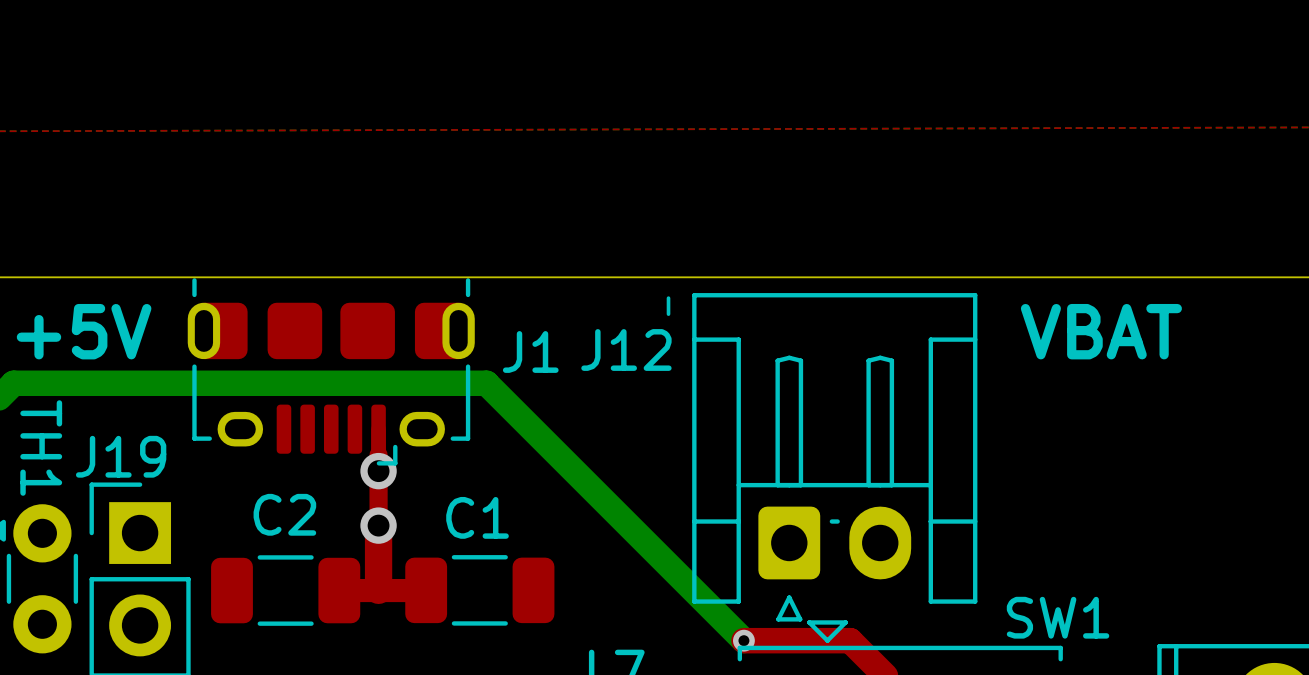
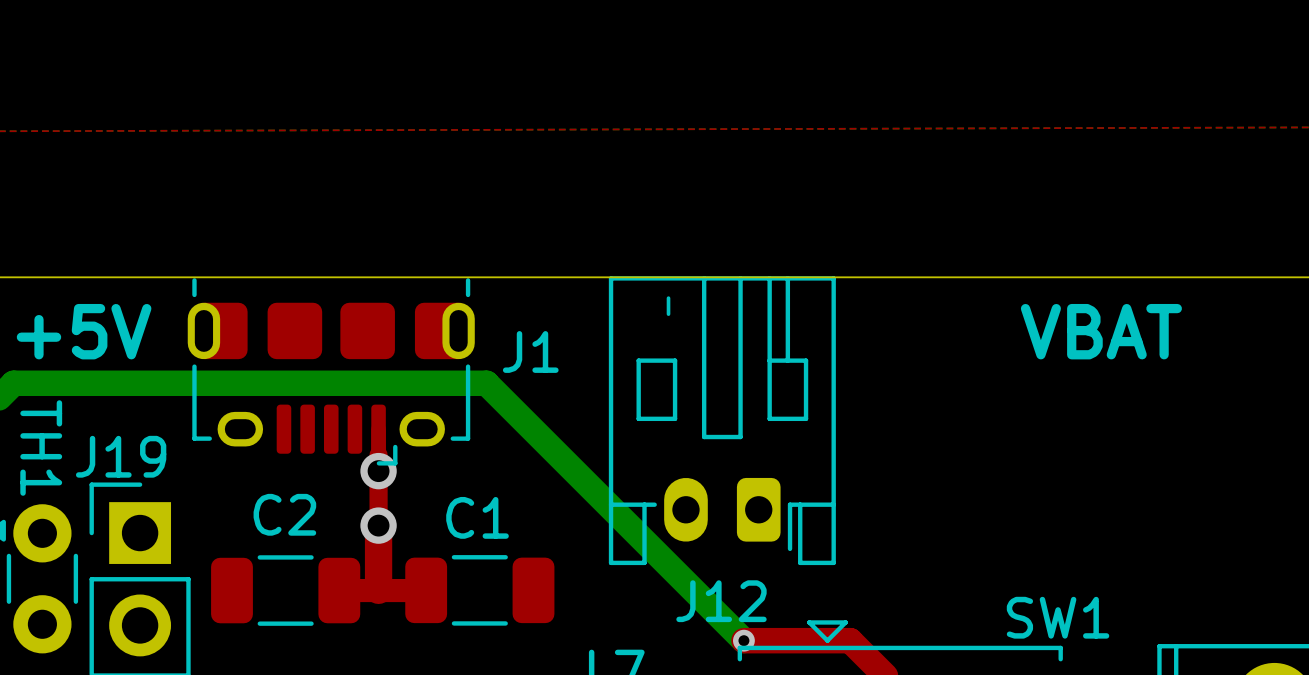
J12 footprint: [692, 293, 978, 622] -> [608, 276, 836, 566]
J12 name position: J12 (626, 349) -> J12 (721, 601)

